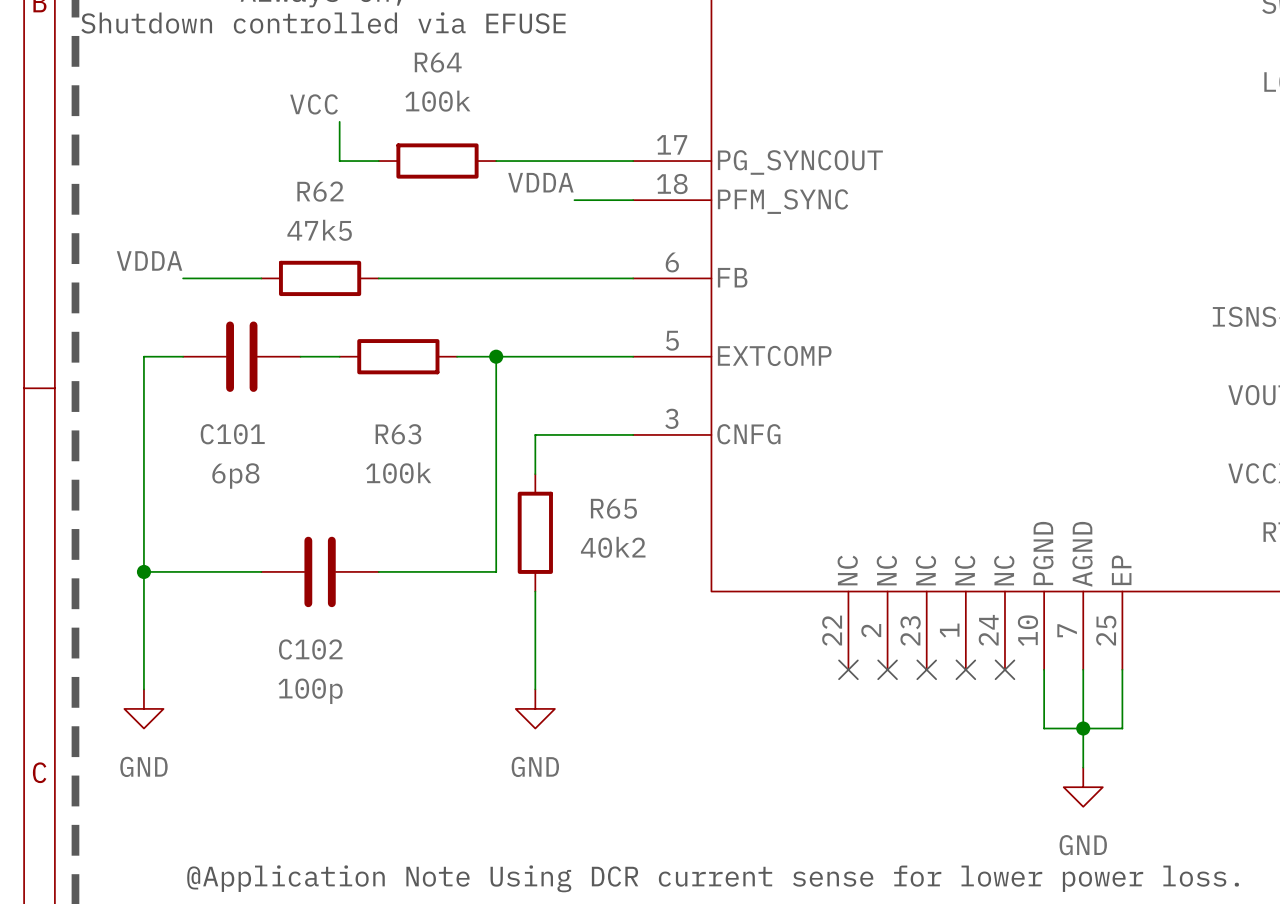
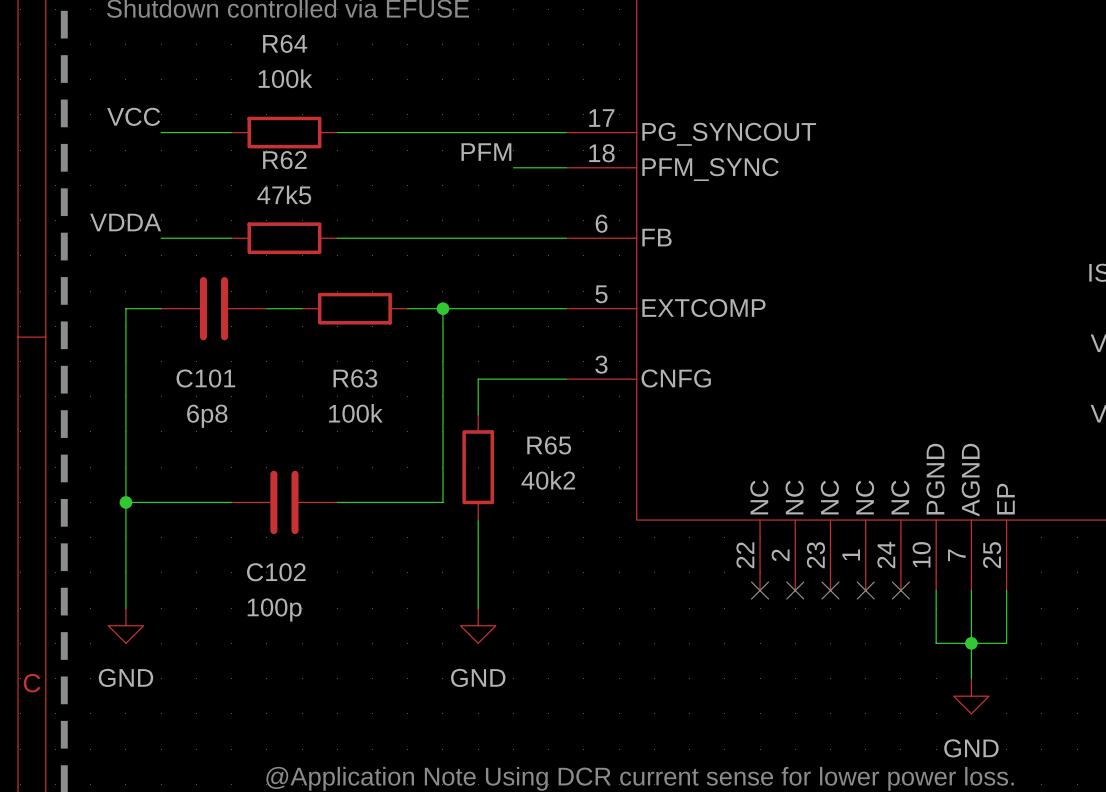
label position: VCC (314, 104) -> VCC (133, 116)
wire: (339, 121) (339, 161) (378, 161) -> (442, 132) (337, 132)
wire: none -> (161, 132) (231, 132)
R64 position: (437, 161) -> (284, 132)
label: VDDA (540, 182) -> PFM (486, 152)

